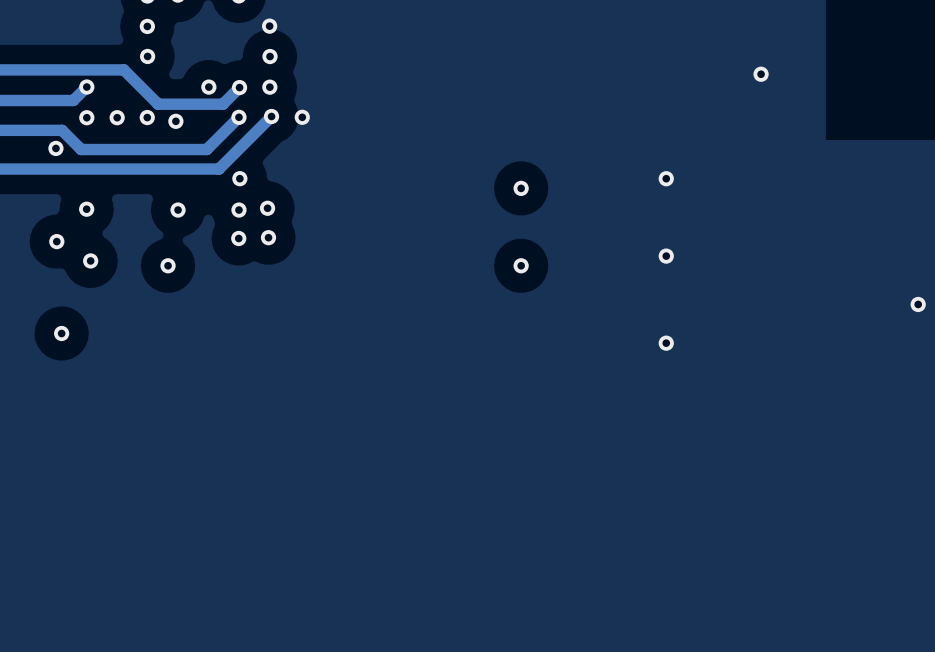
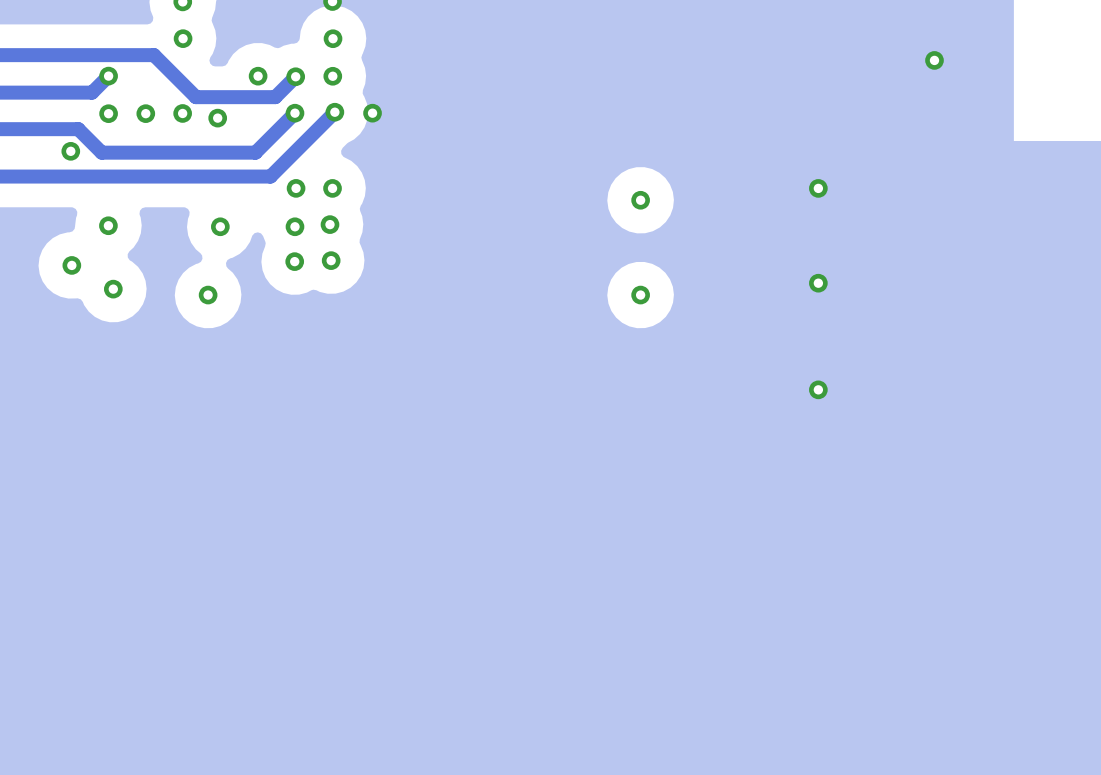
via: none -> (332, 188)
via: (61, 333) -> none

